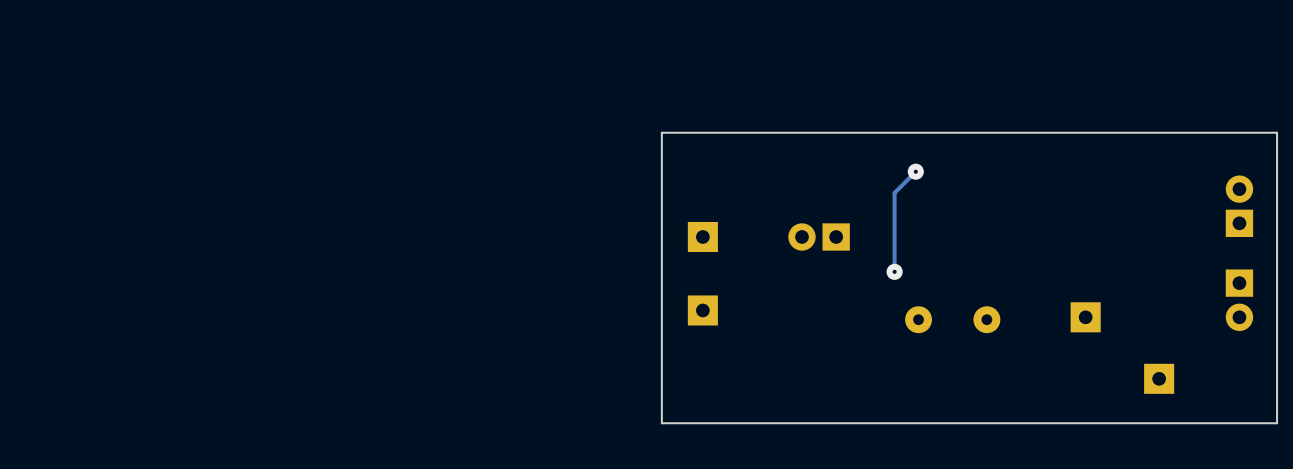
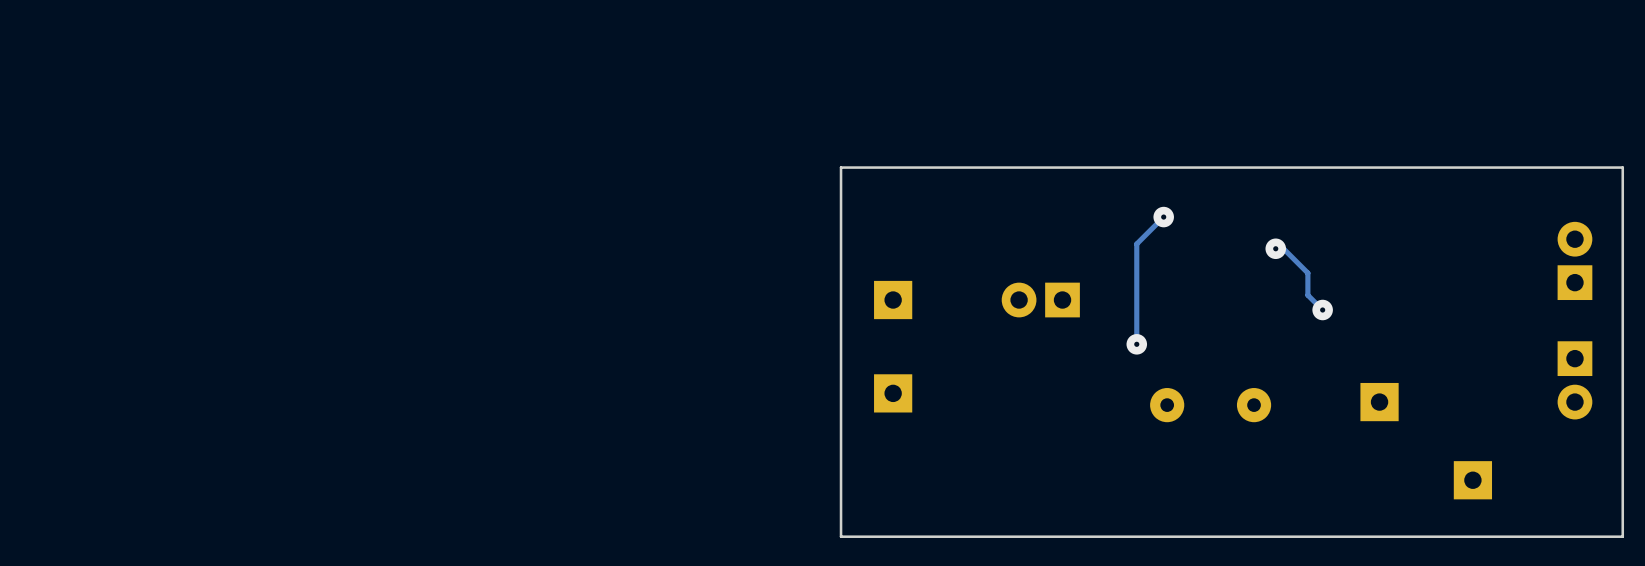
track: none -> (1275, 248) (1283, 248) (1307, 273) (1307, 295) (1322, 310)
via: none -> (1275, 248)
via: none -> (1322, 310)

